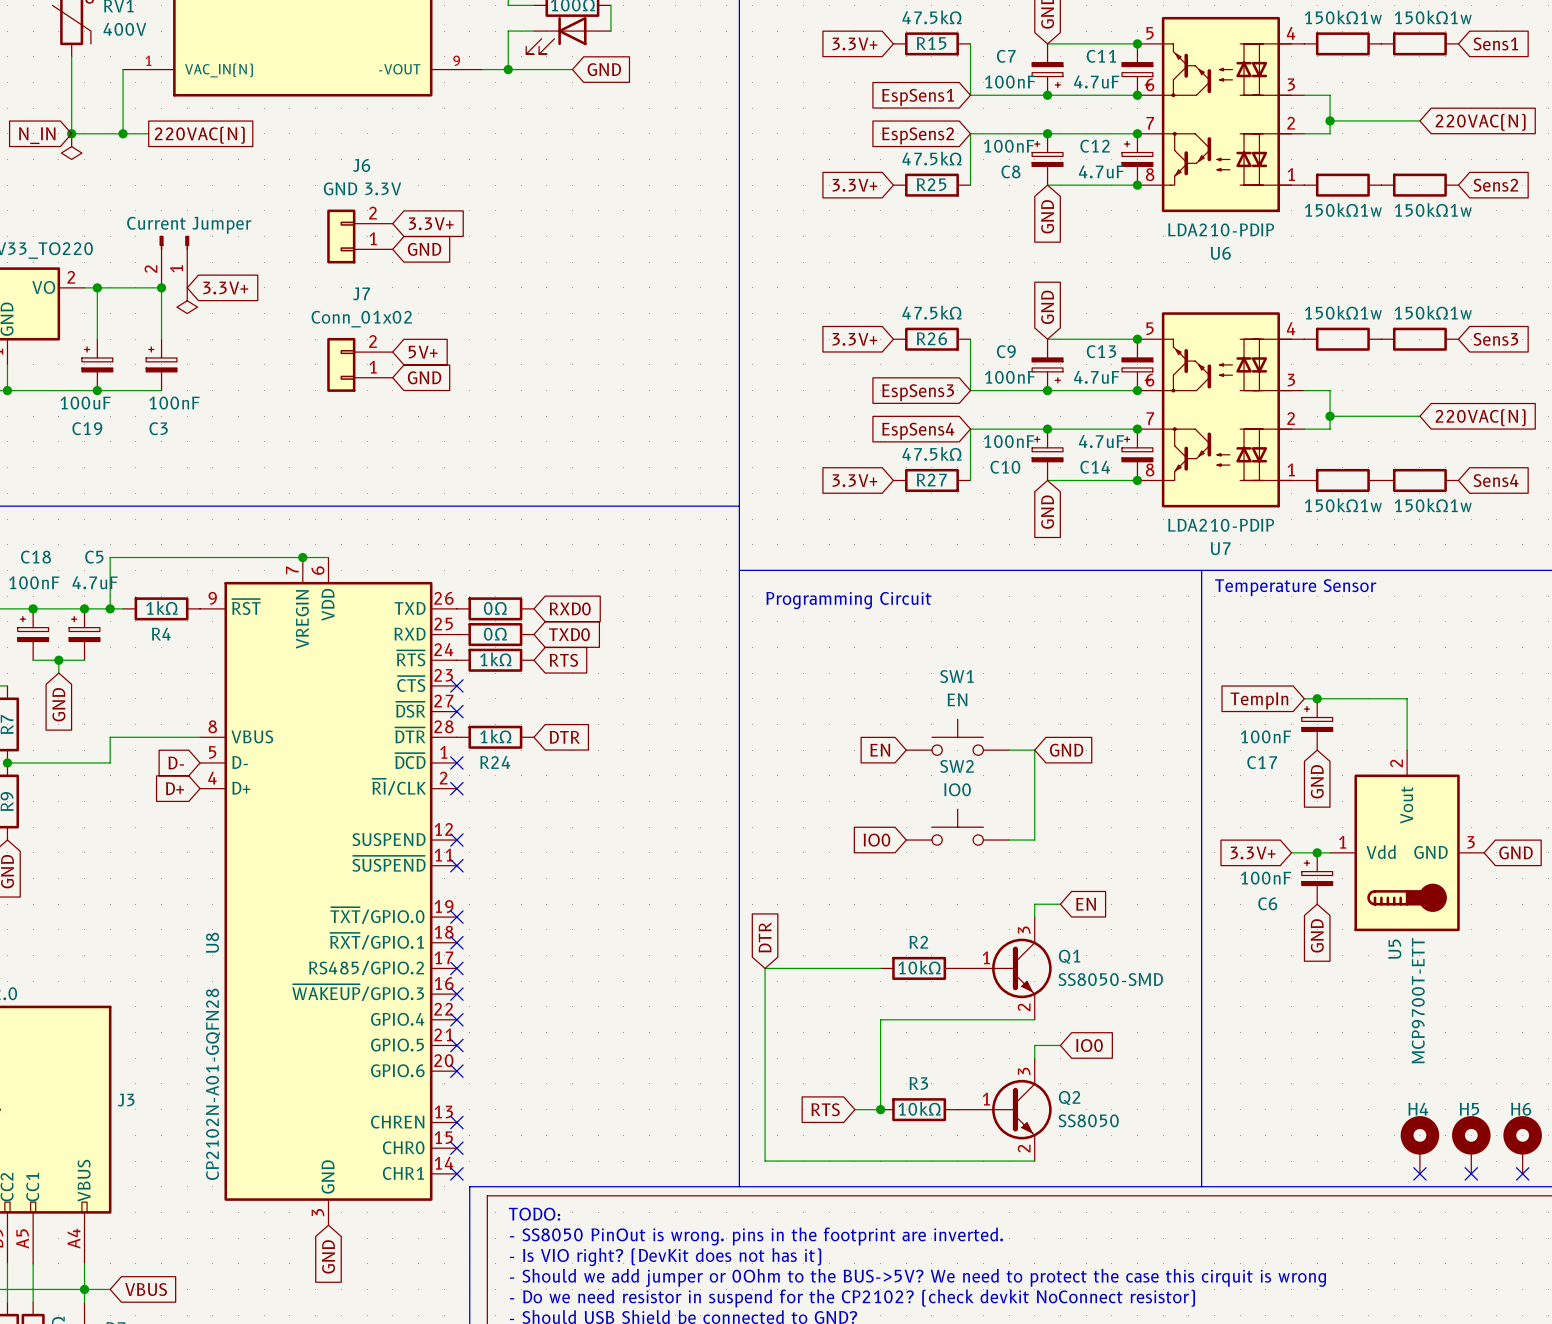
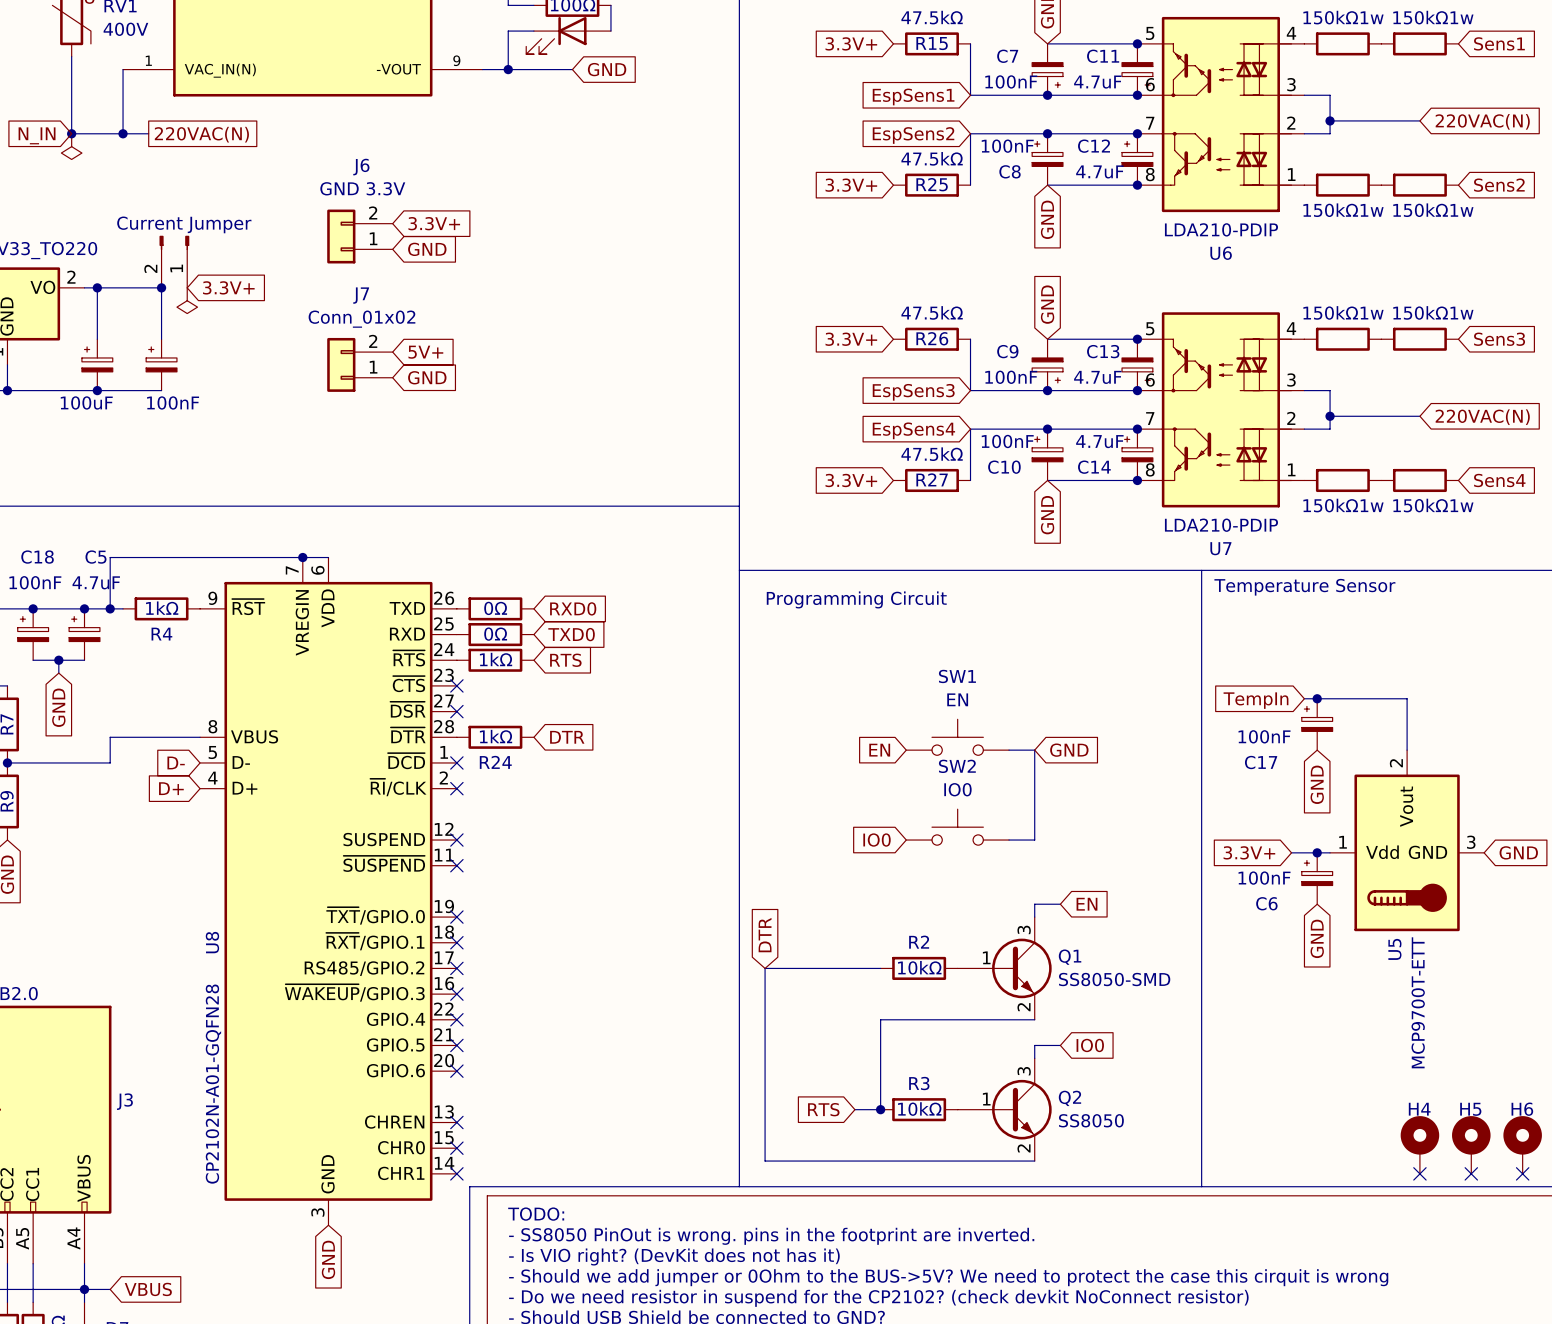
C19 name: C19 (87, 428) -> none
C3 name: C3 (158, 428) -> none

